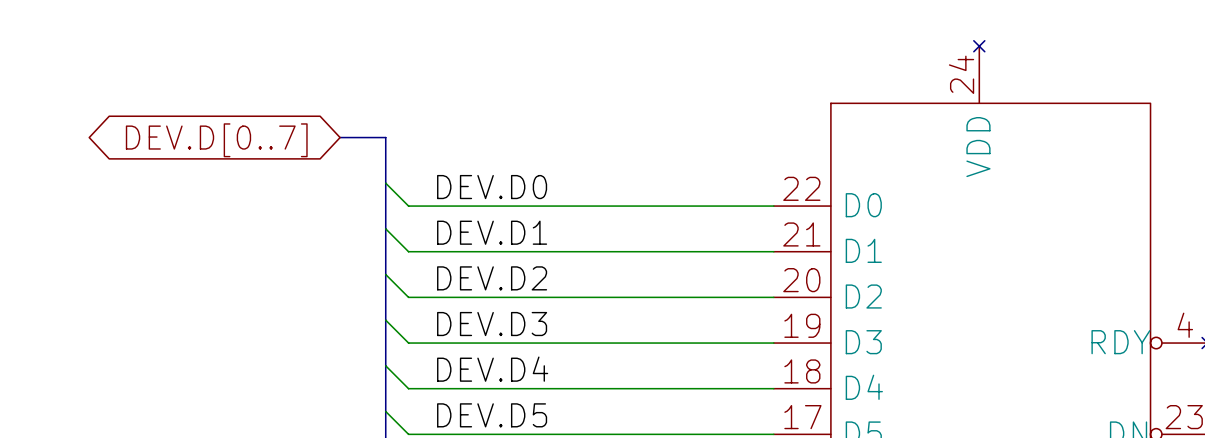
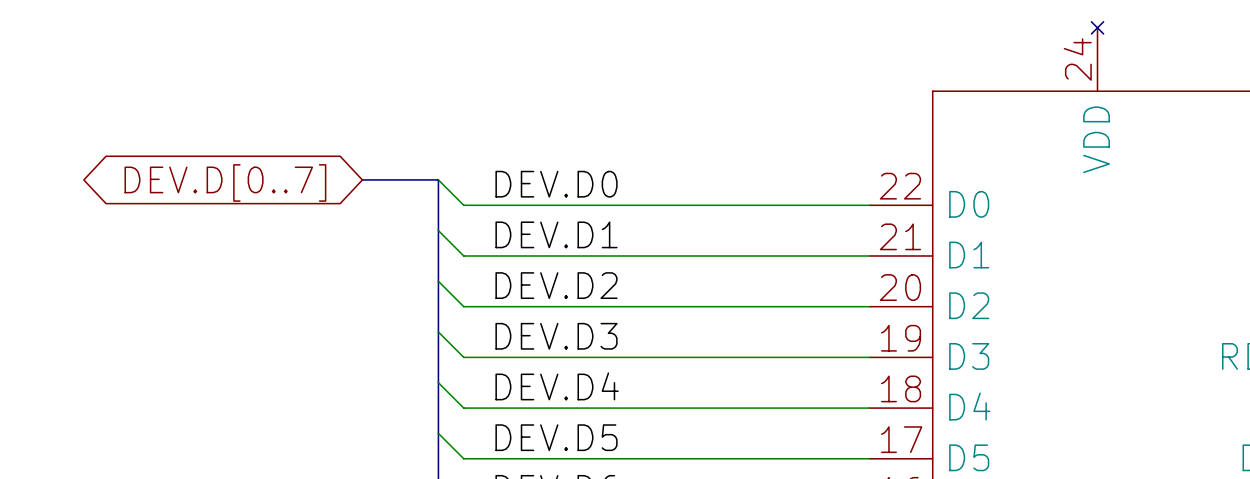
bus: (340, 137) (385, 137) (385, 183) -> (362, 179) (438, 179)
global label position: DEV.D[0..7] (216, 140) -> DEV.D[0..7] (225, 182)

